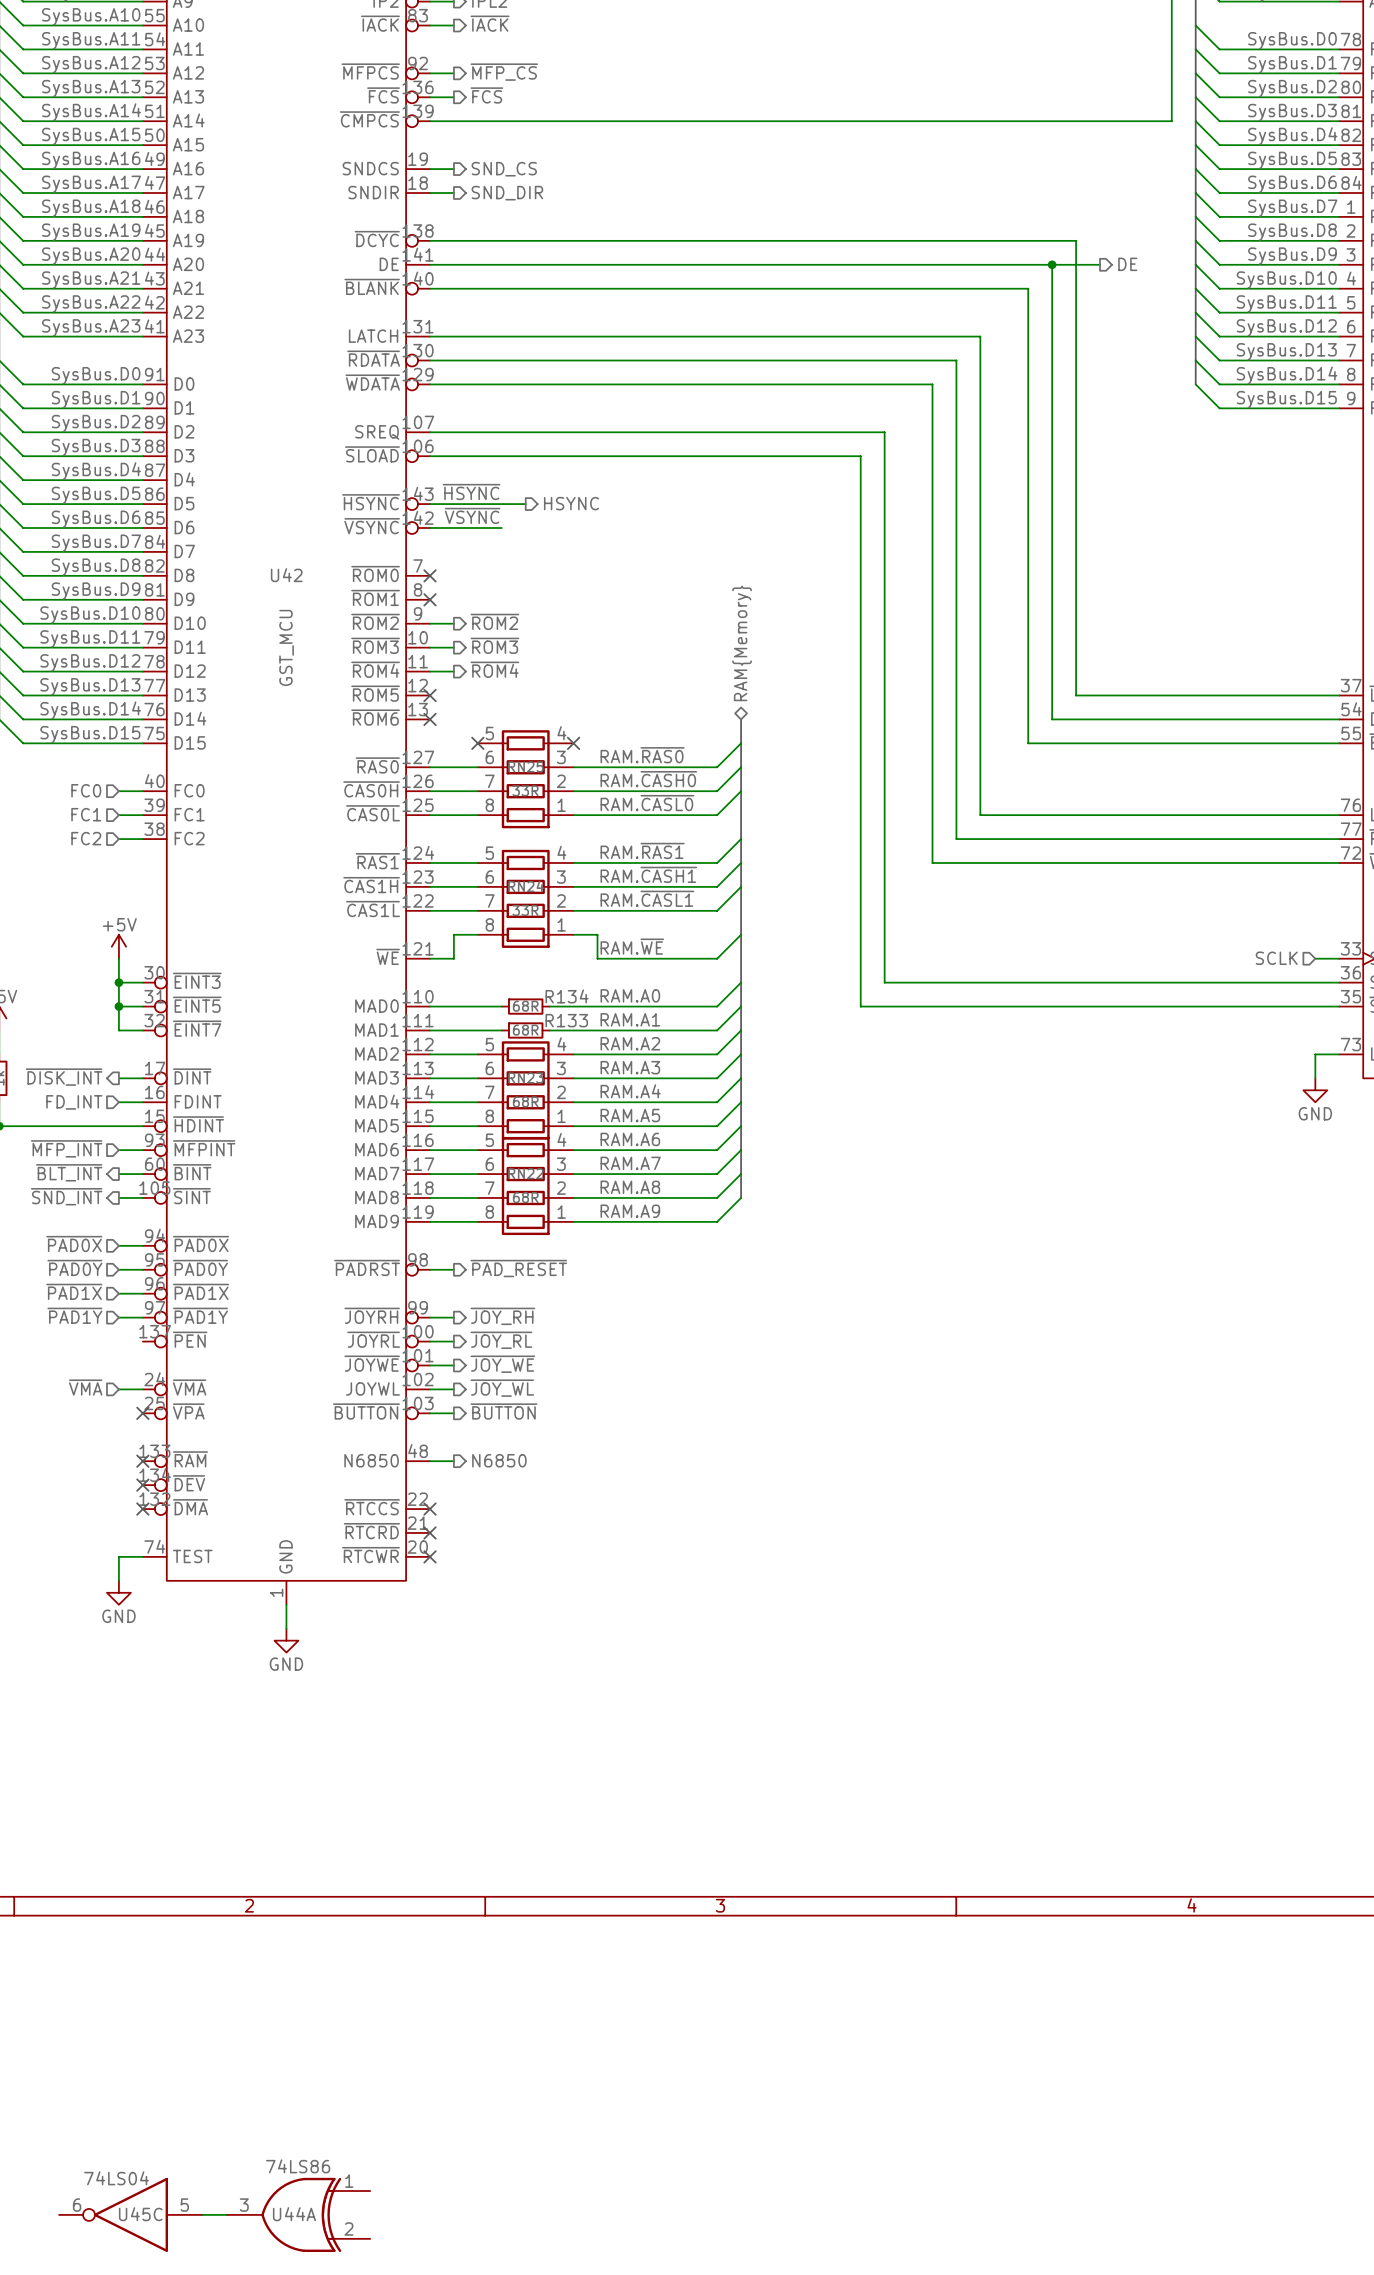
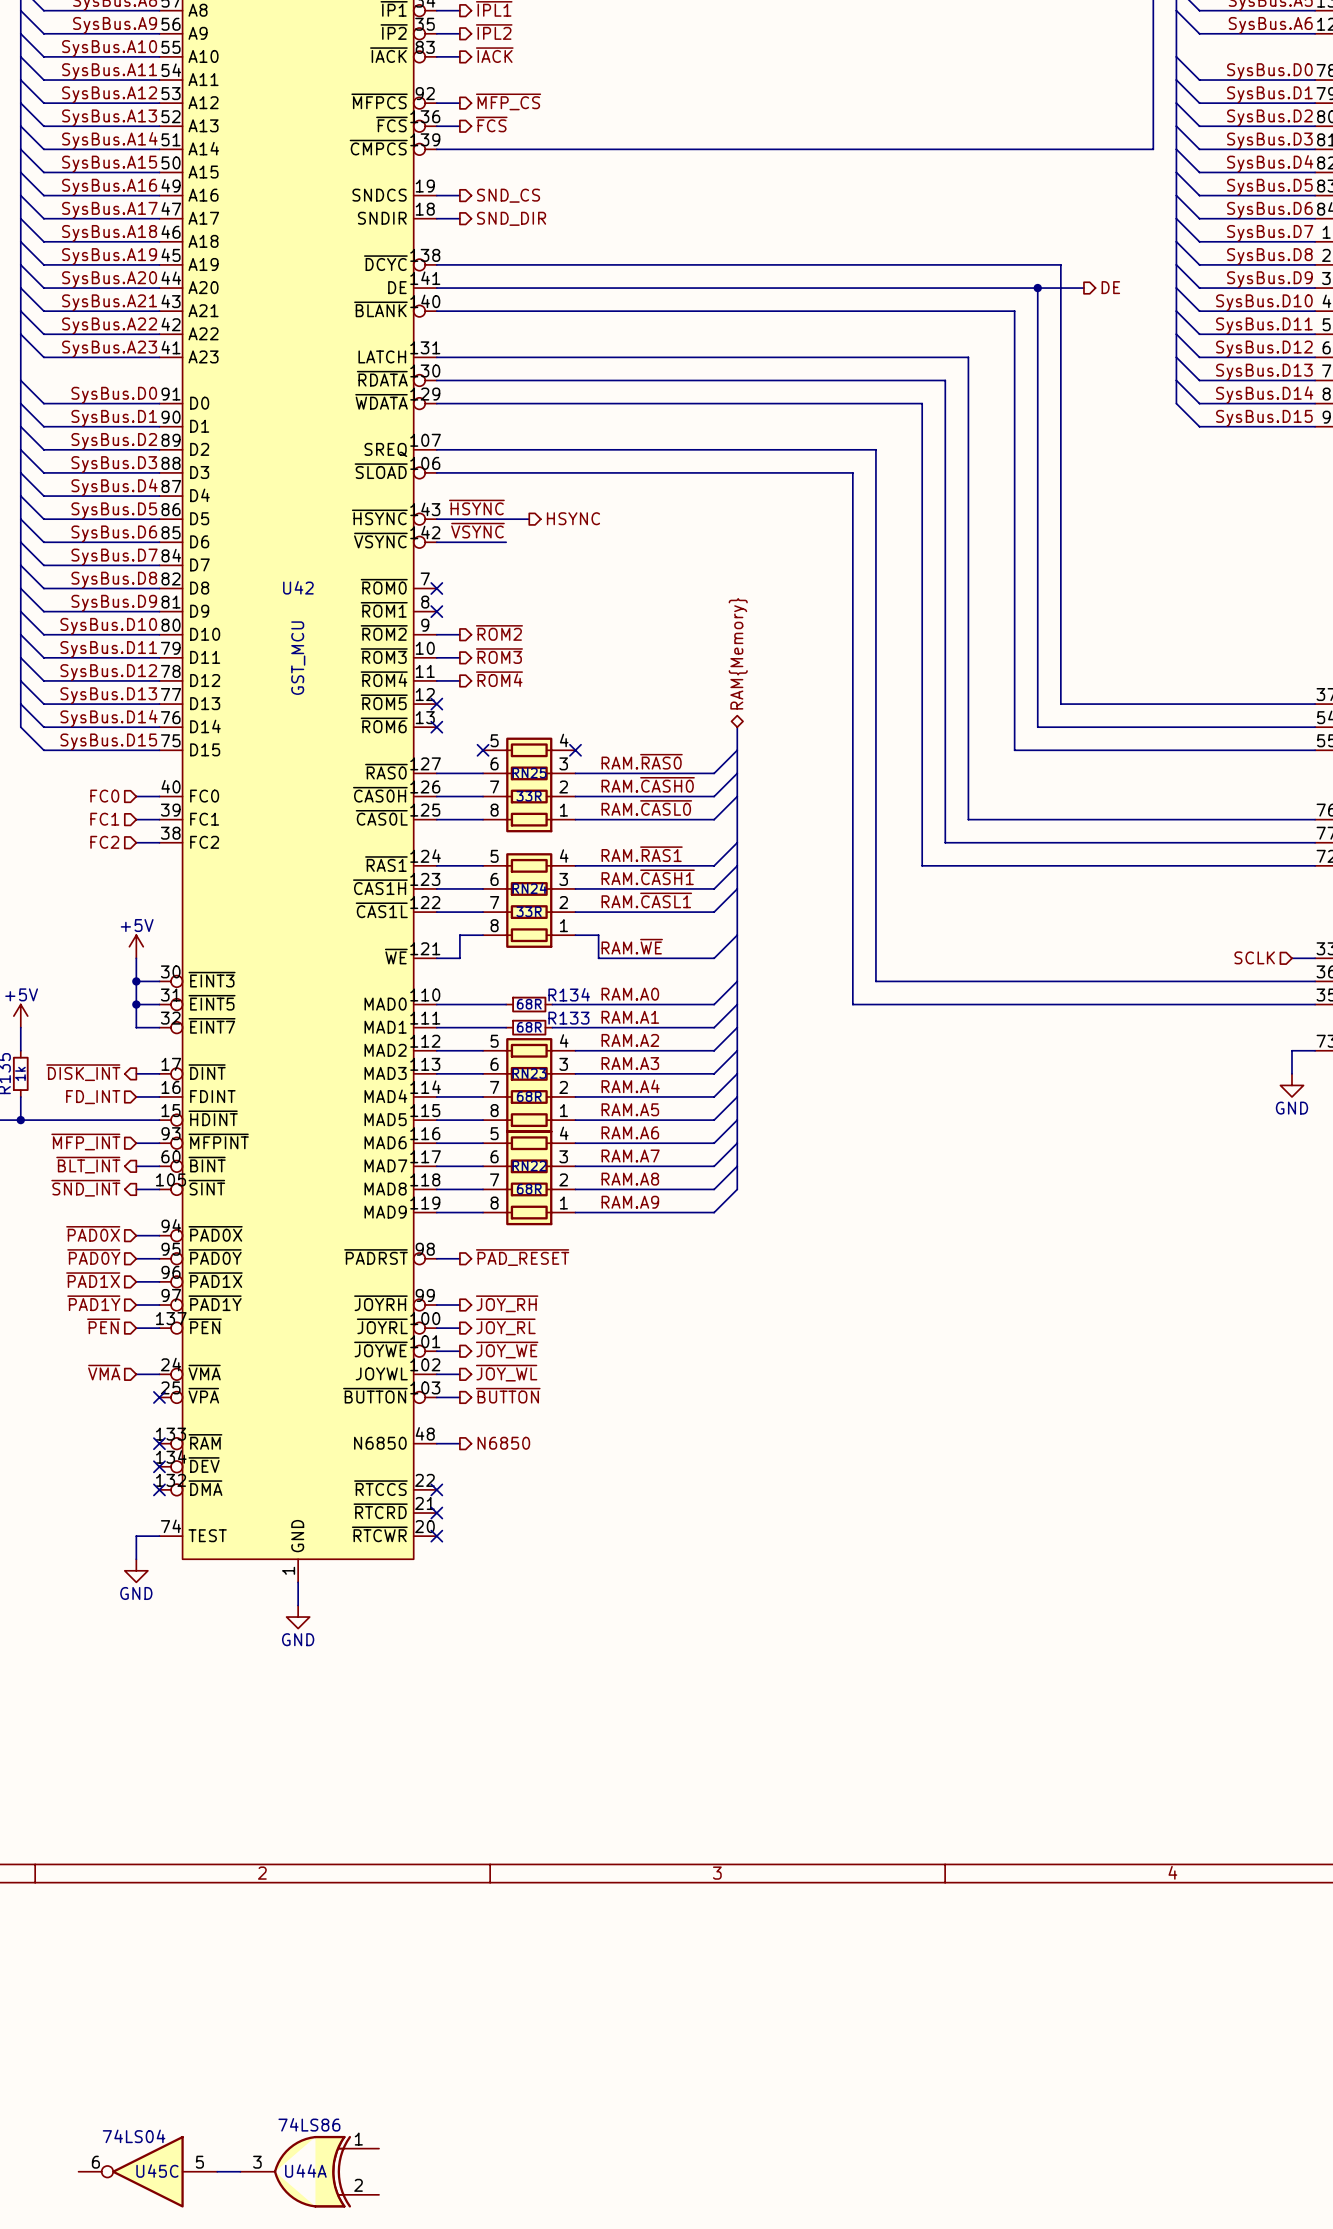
hierarchical label: none -> ~{PEN} (103, 1326)
wire: none -> (136, 1328) (159, 1328)

